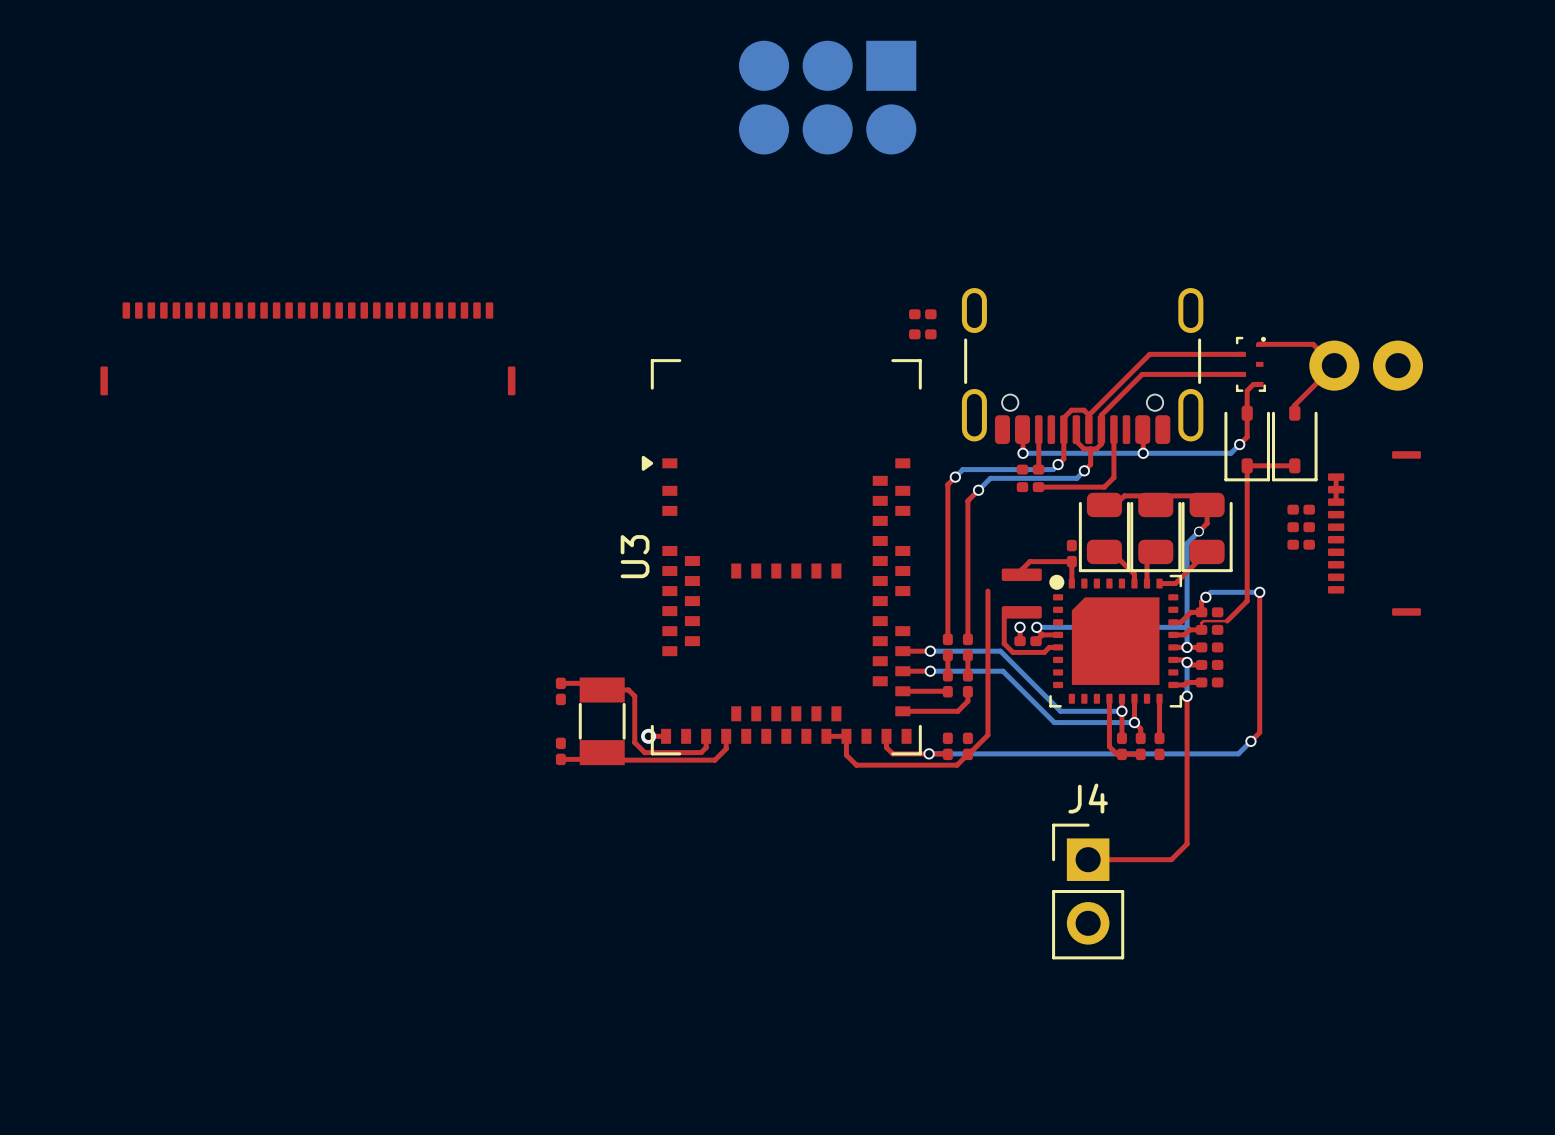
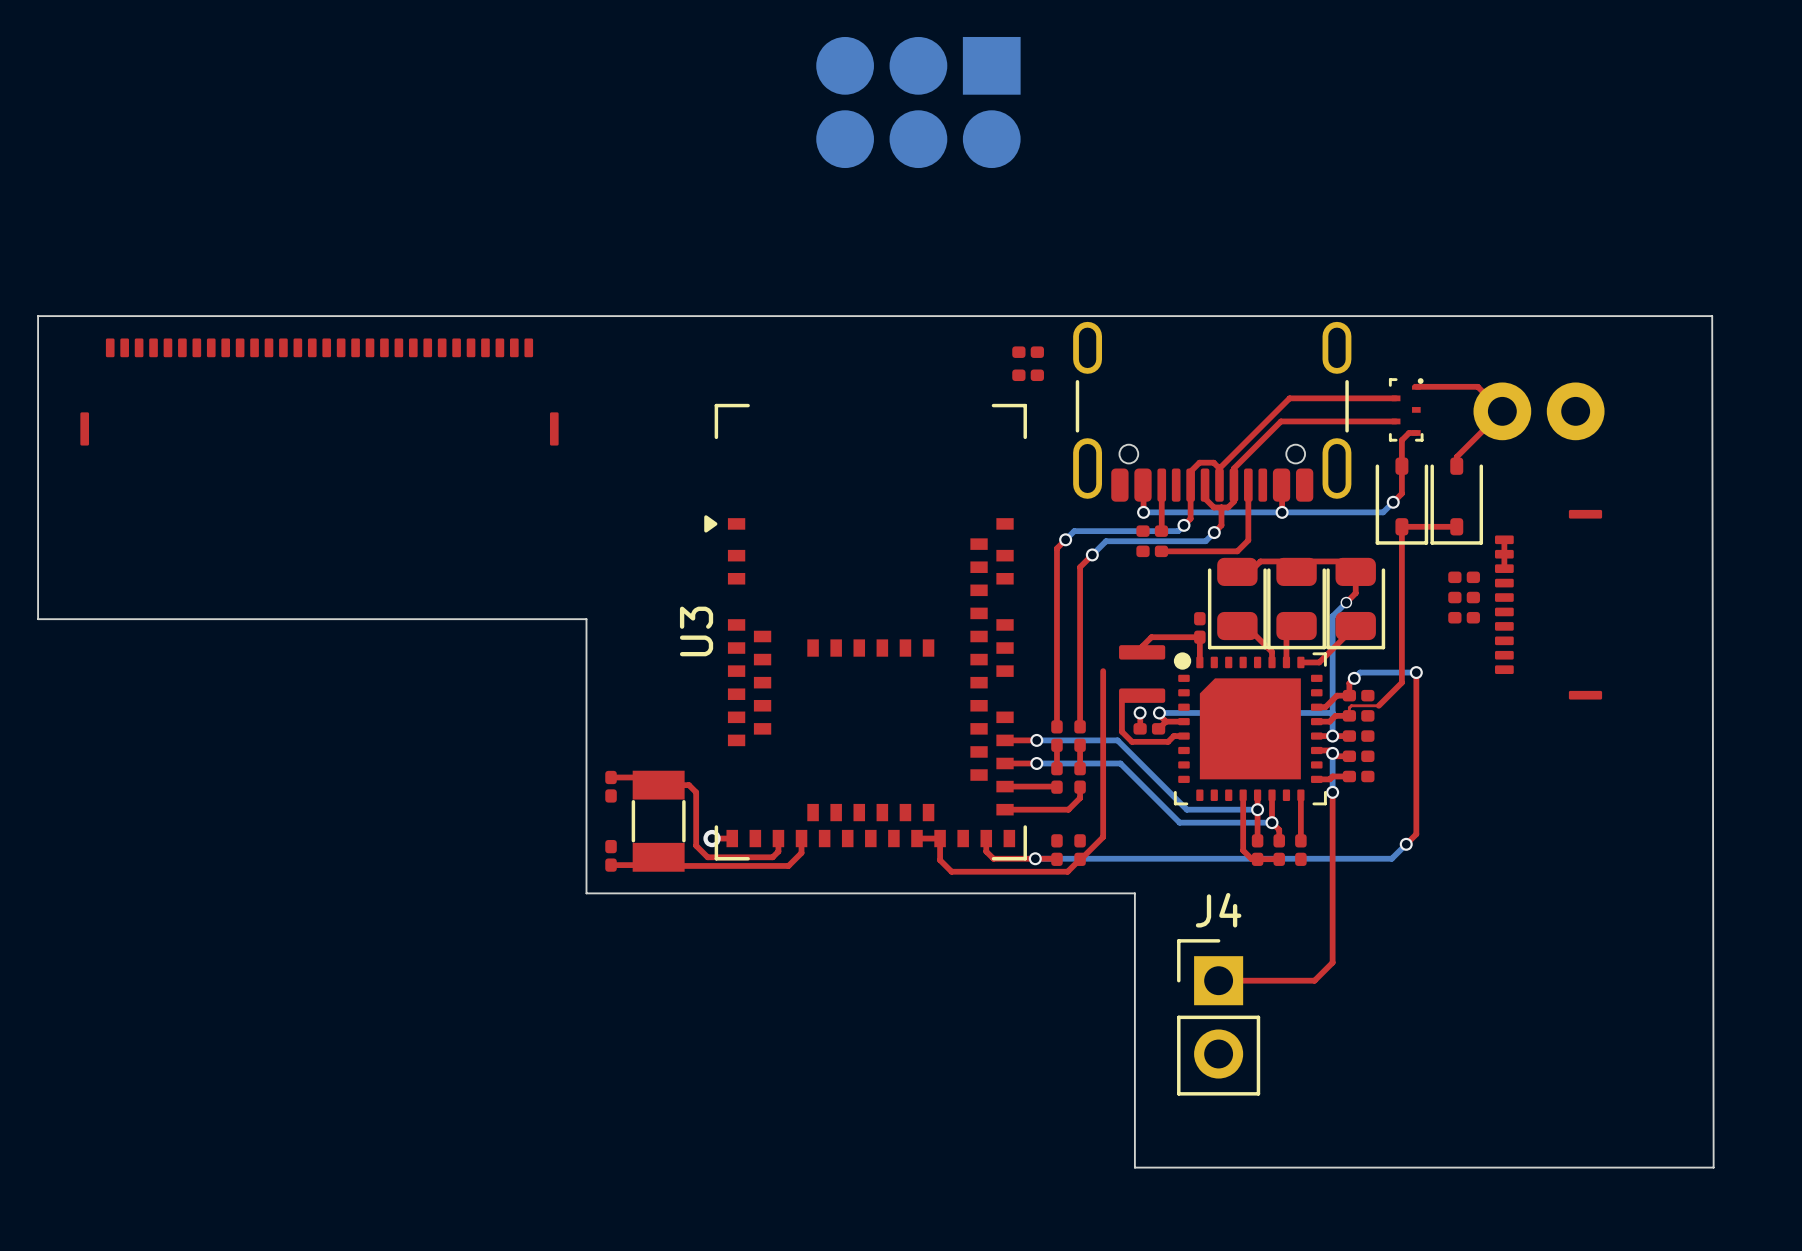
board edge: none -> (38, 316) (38, 619) (586, 619) (586, 893) (1134, 893) (1134, 1167) (1713, 1167) (1712, 316) (38, 316)

